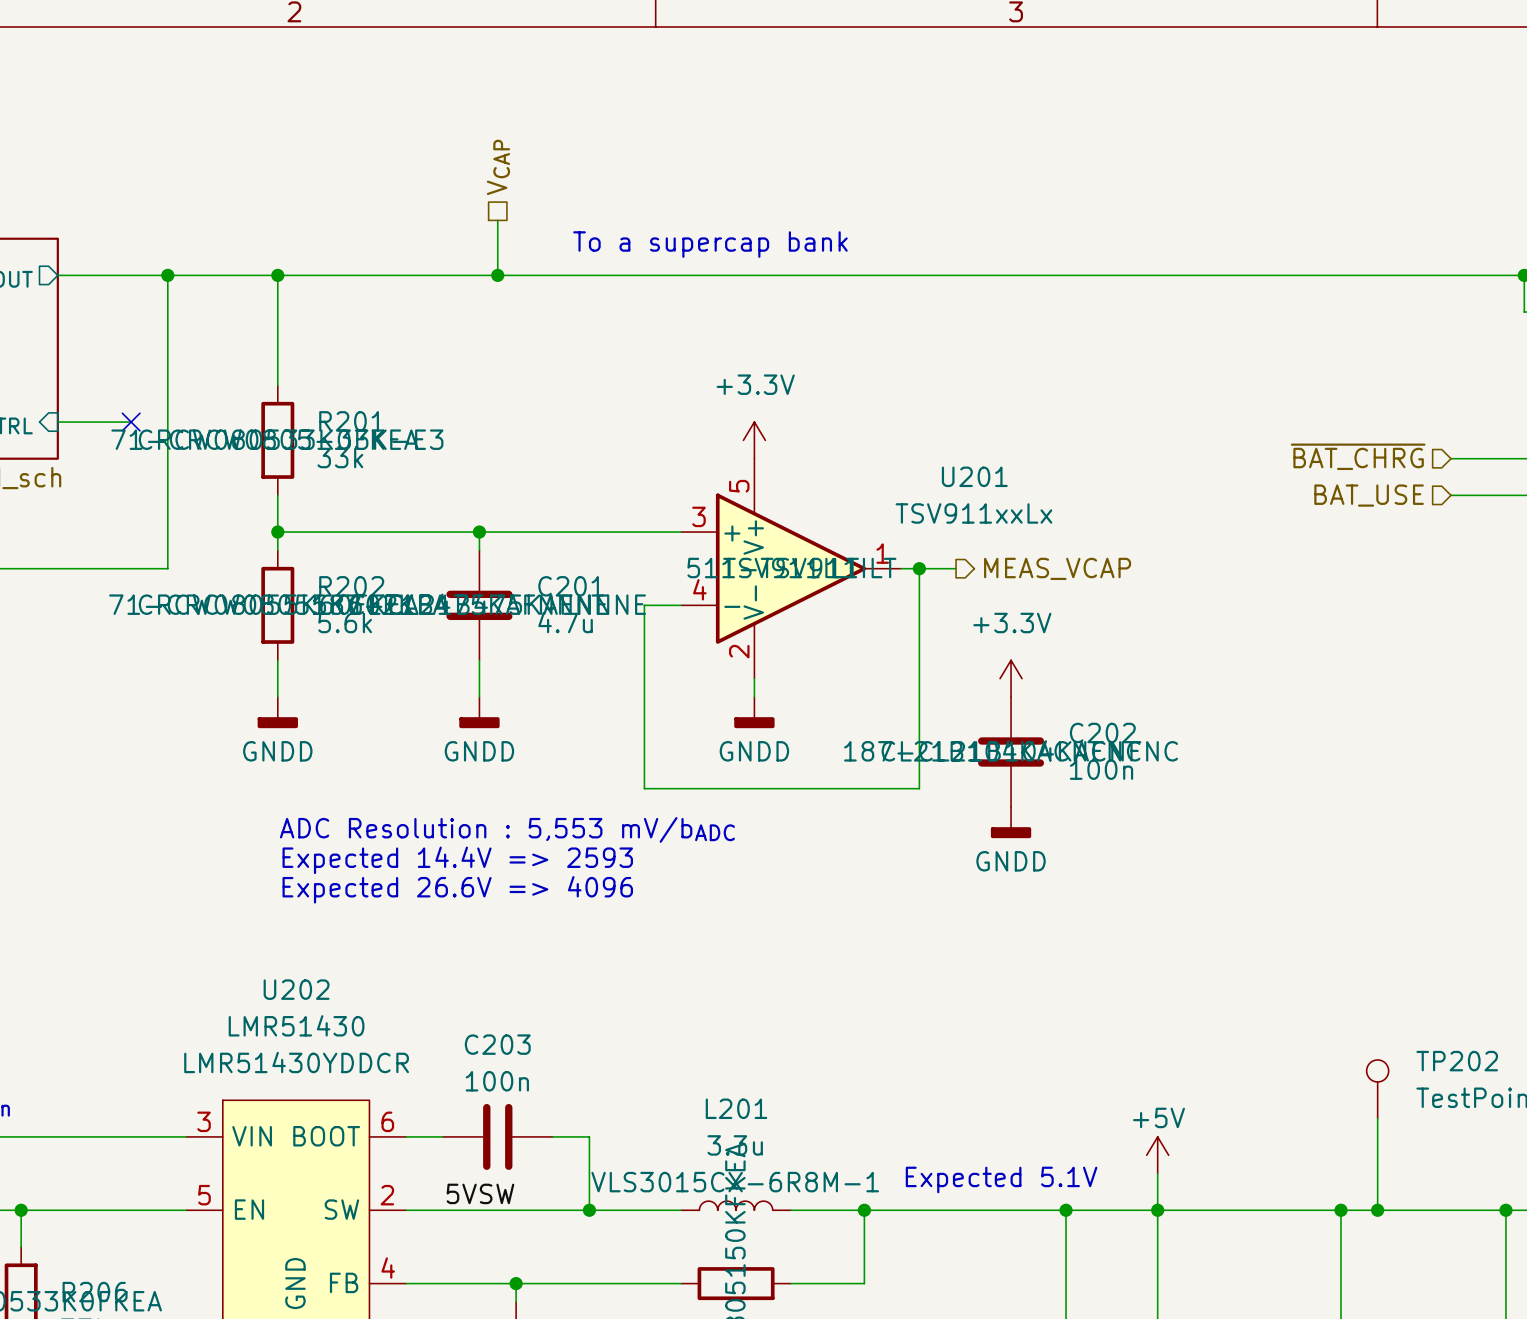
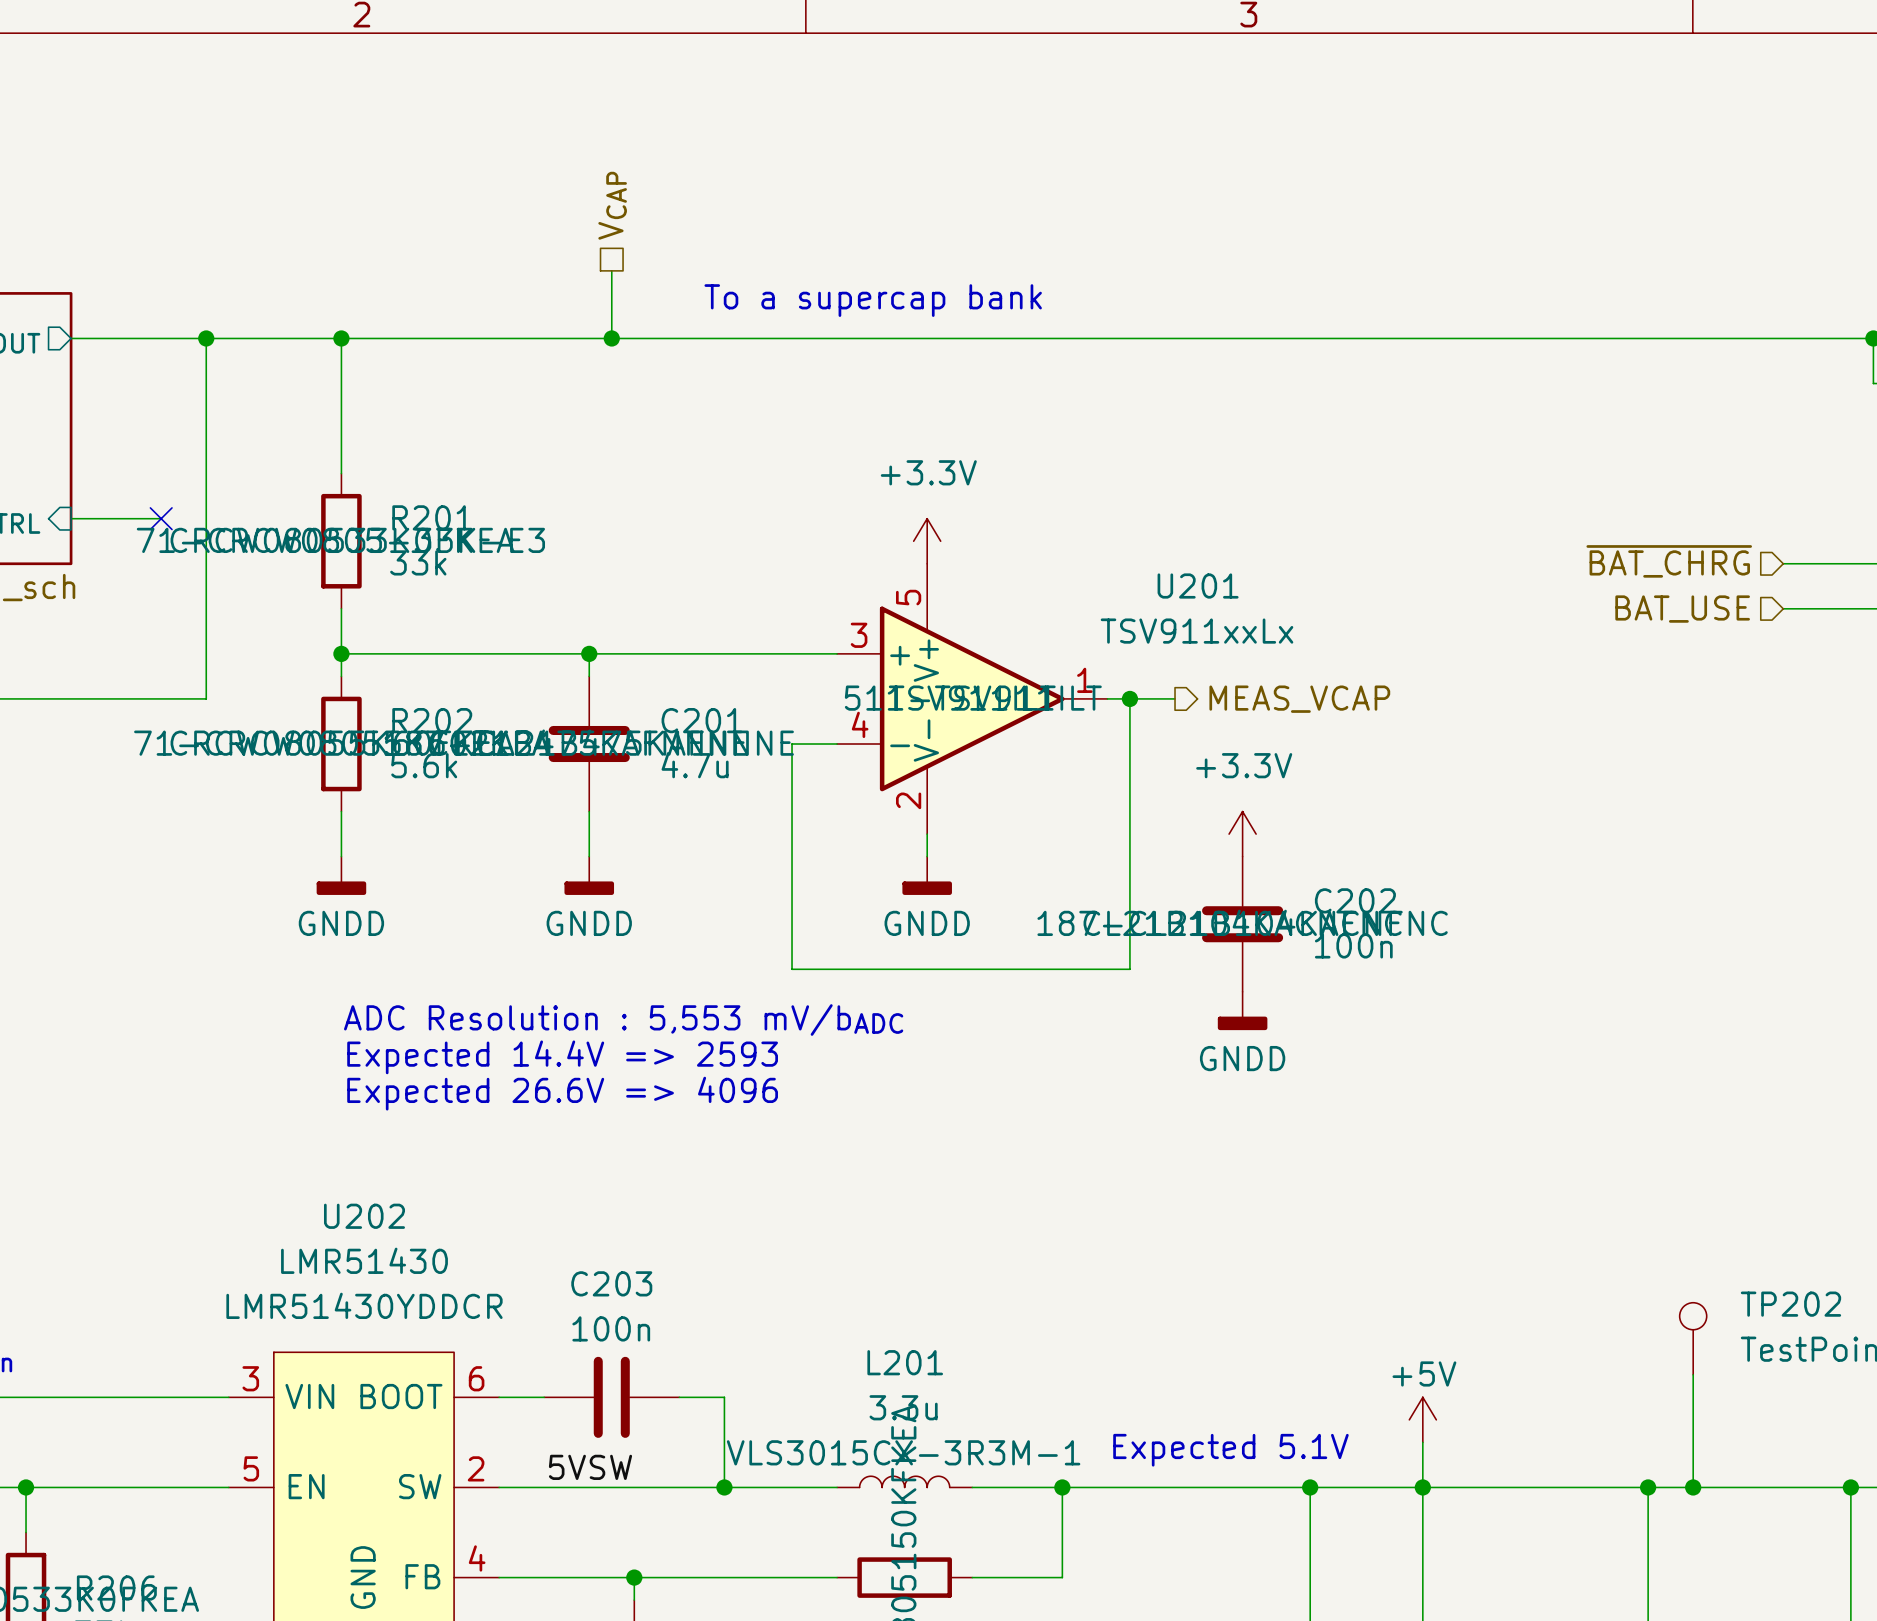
L201 text: VLS3015CX-6R8M-1 (735, 1182) -> VLS3015CX-3R3M-1 (903, 1452)

